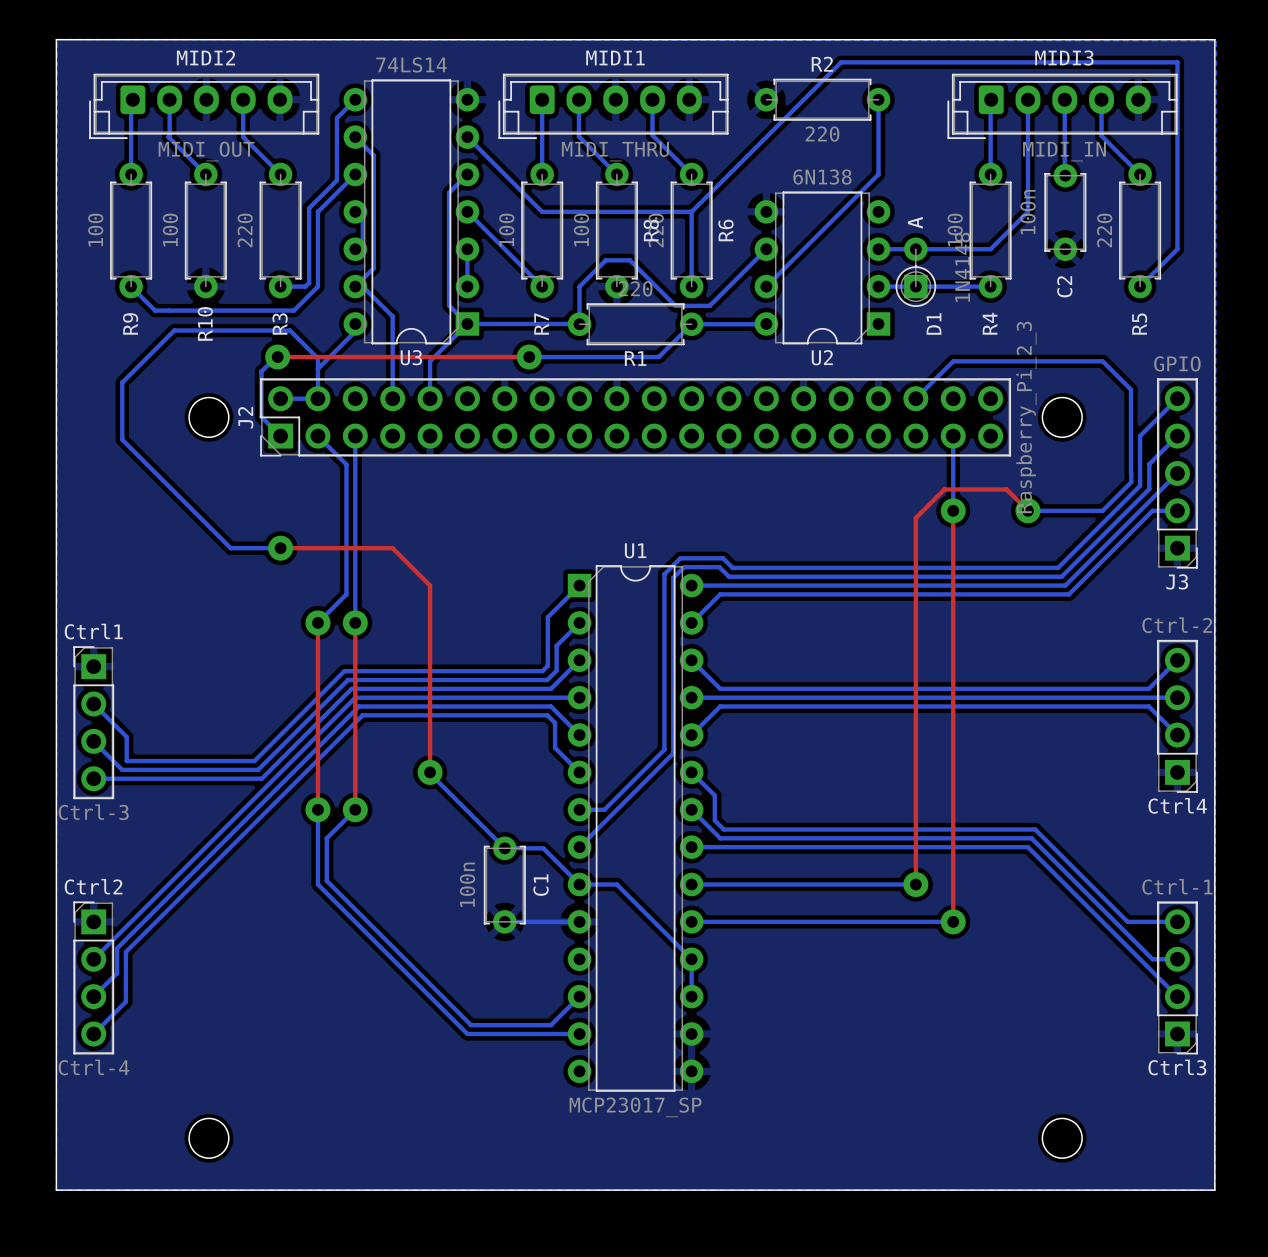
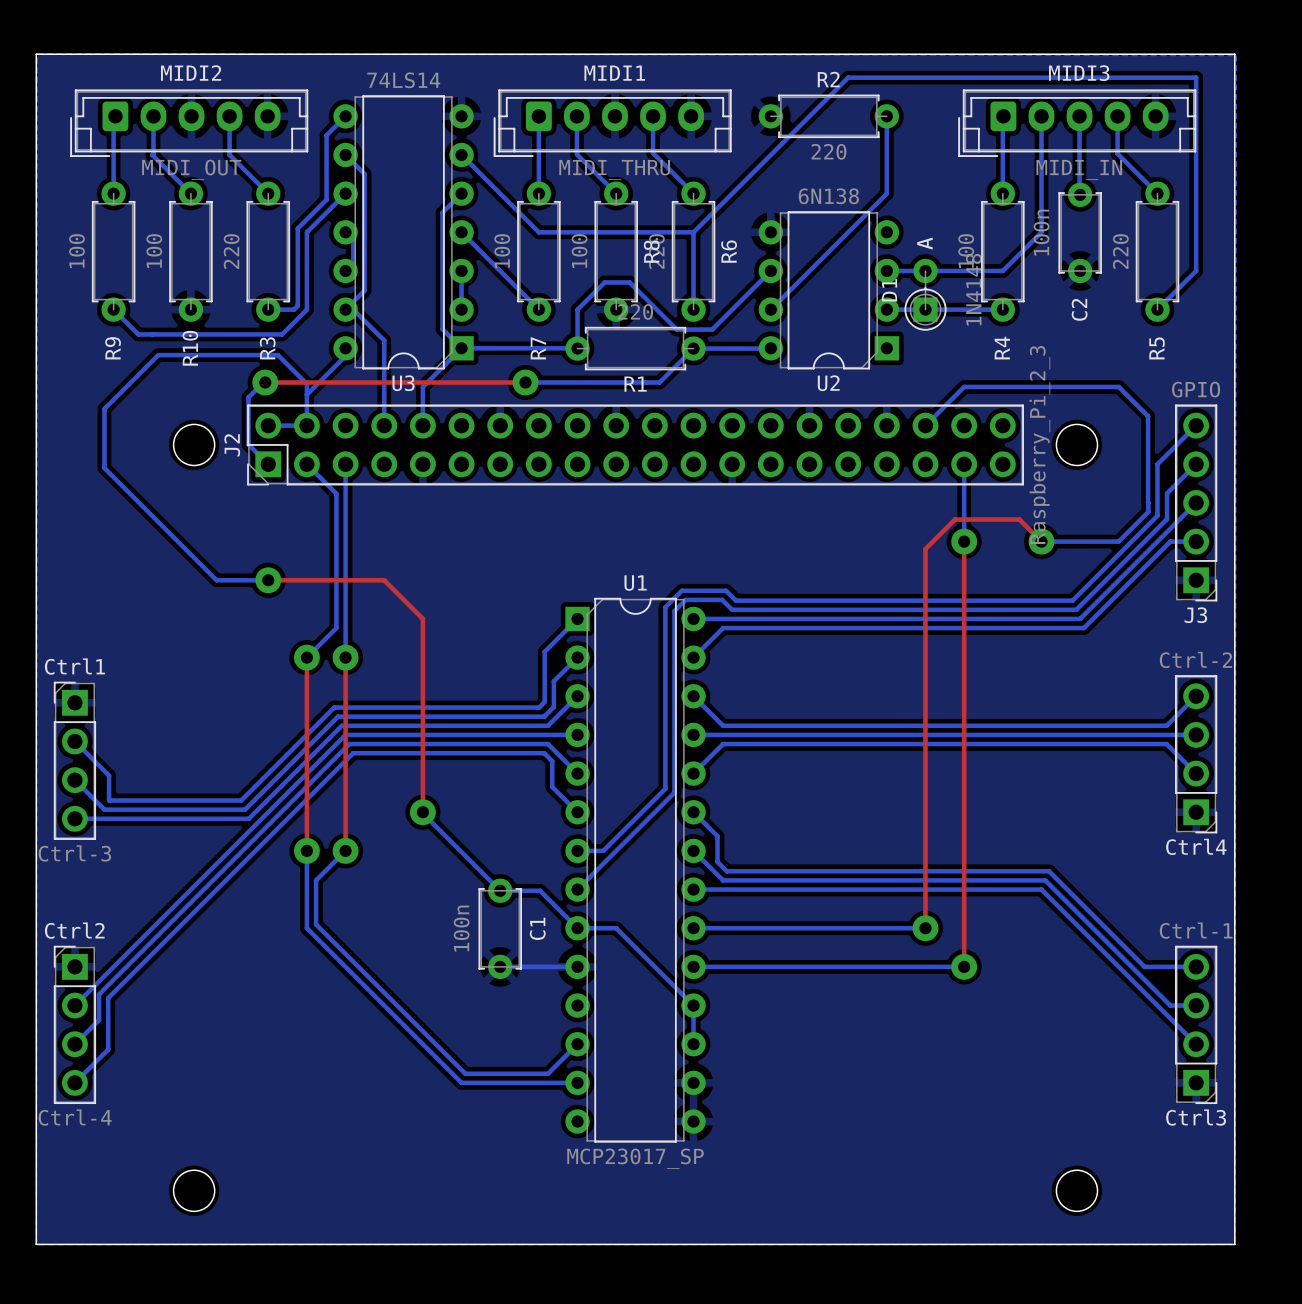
D1 name position: D1 (934, 323) -> D1 (889, 290)

